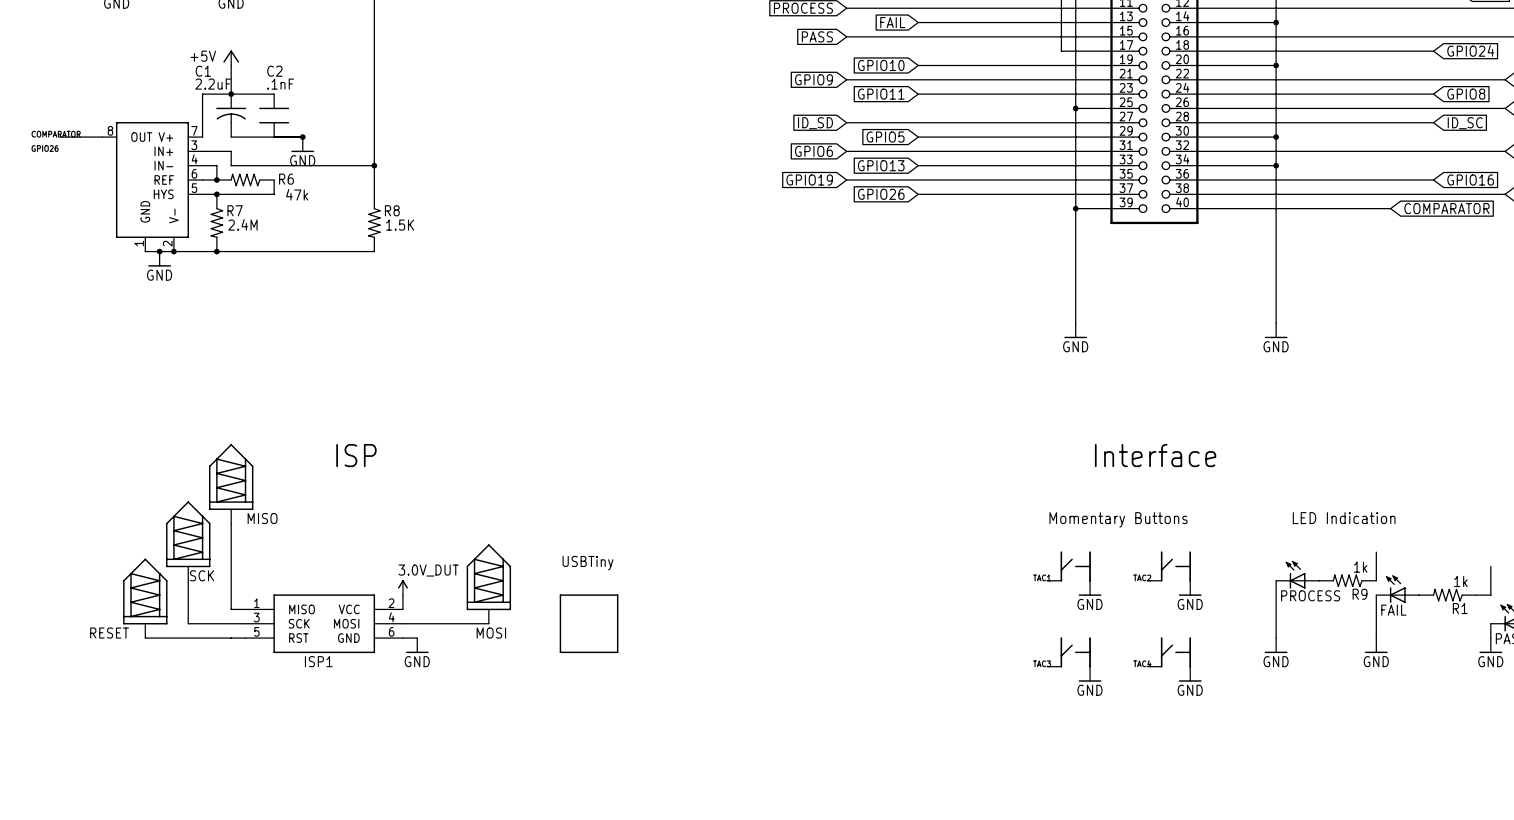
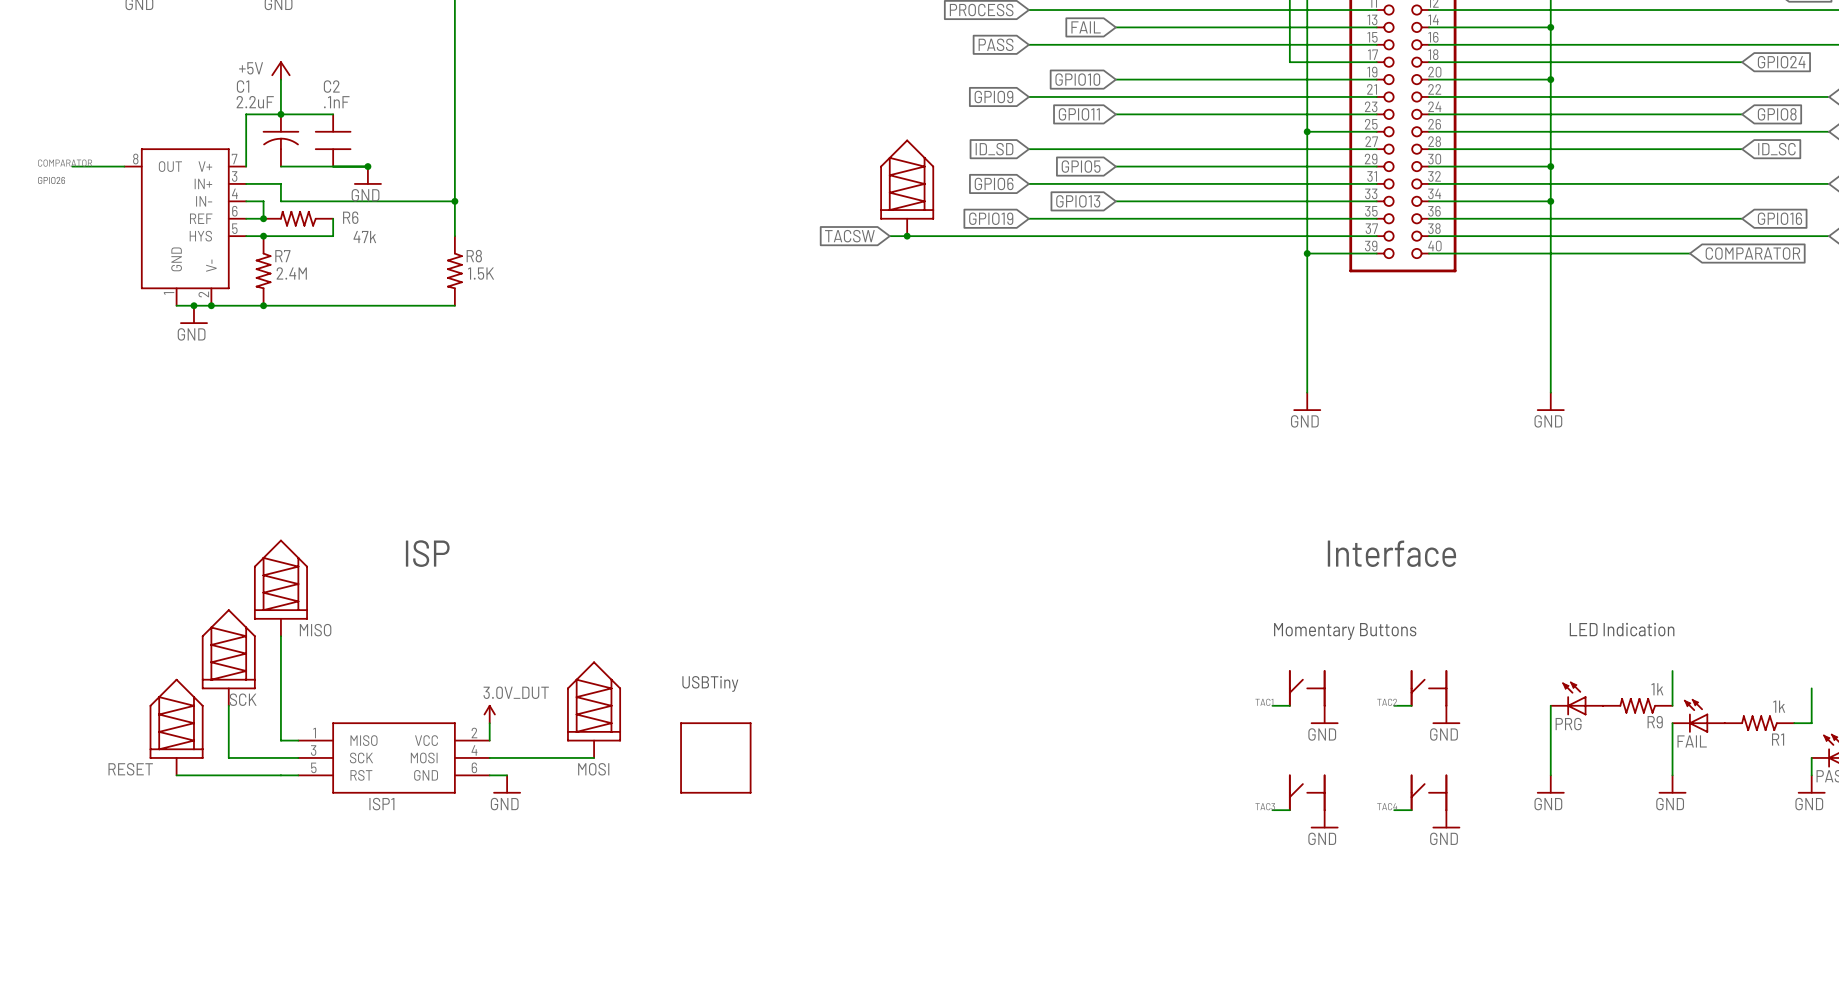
part: none -> (907, 187)
global label: none -> TACSW (849, 236)
wire: none -> (889, 236) (1115, 236)
junction: none -> (907, 236)
global label: GPIO26 (881, 194) -> none
PROCESS name: PROCESS (1310, 595) -> PRG (1568, 724)

